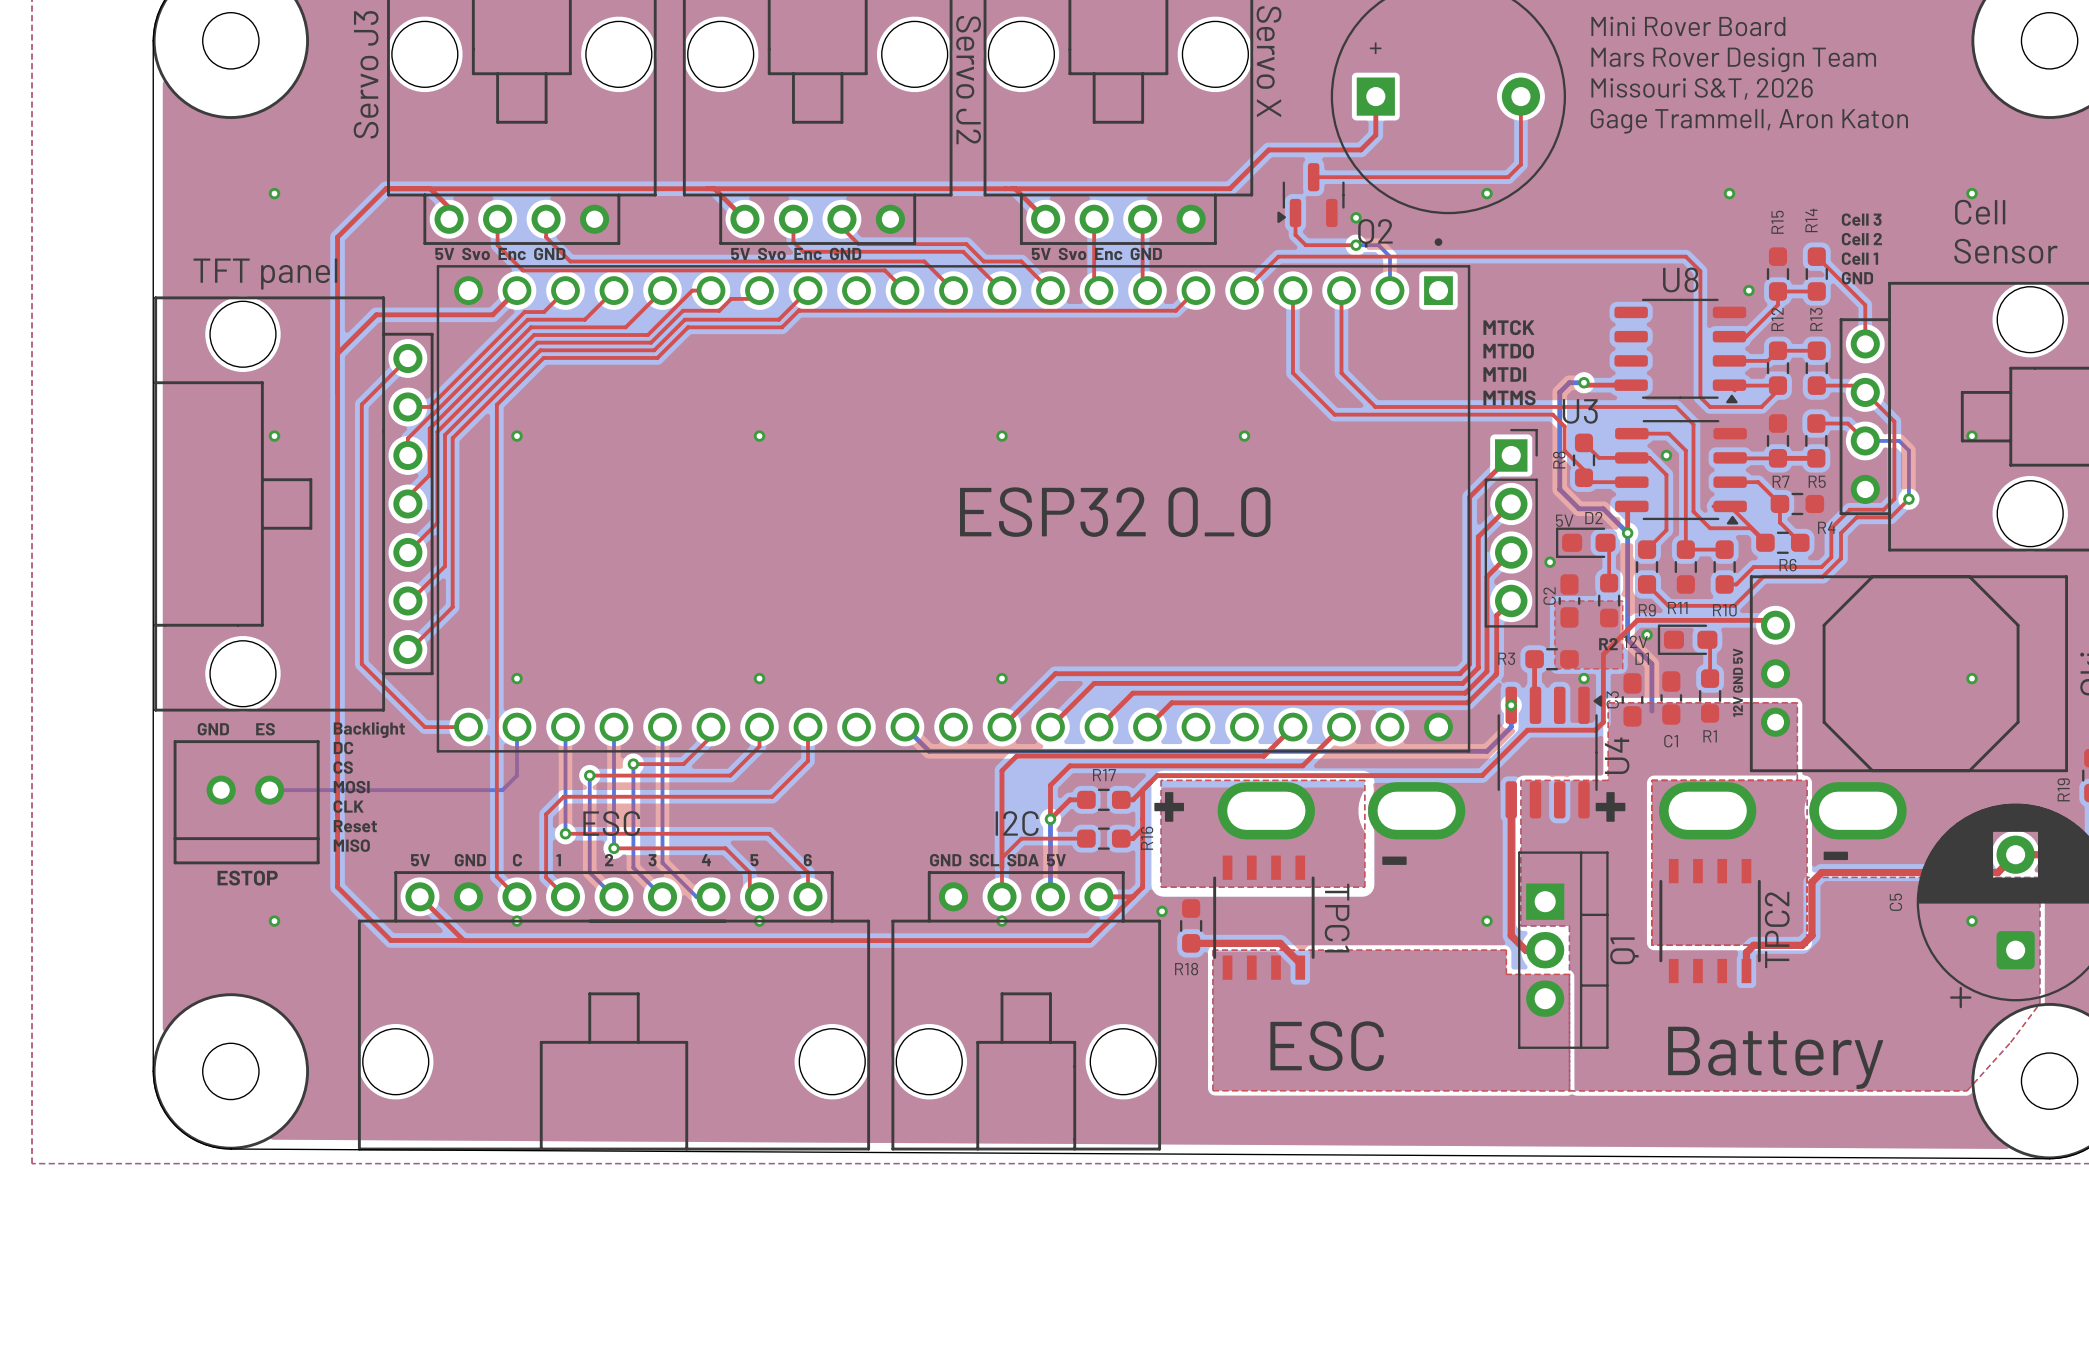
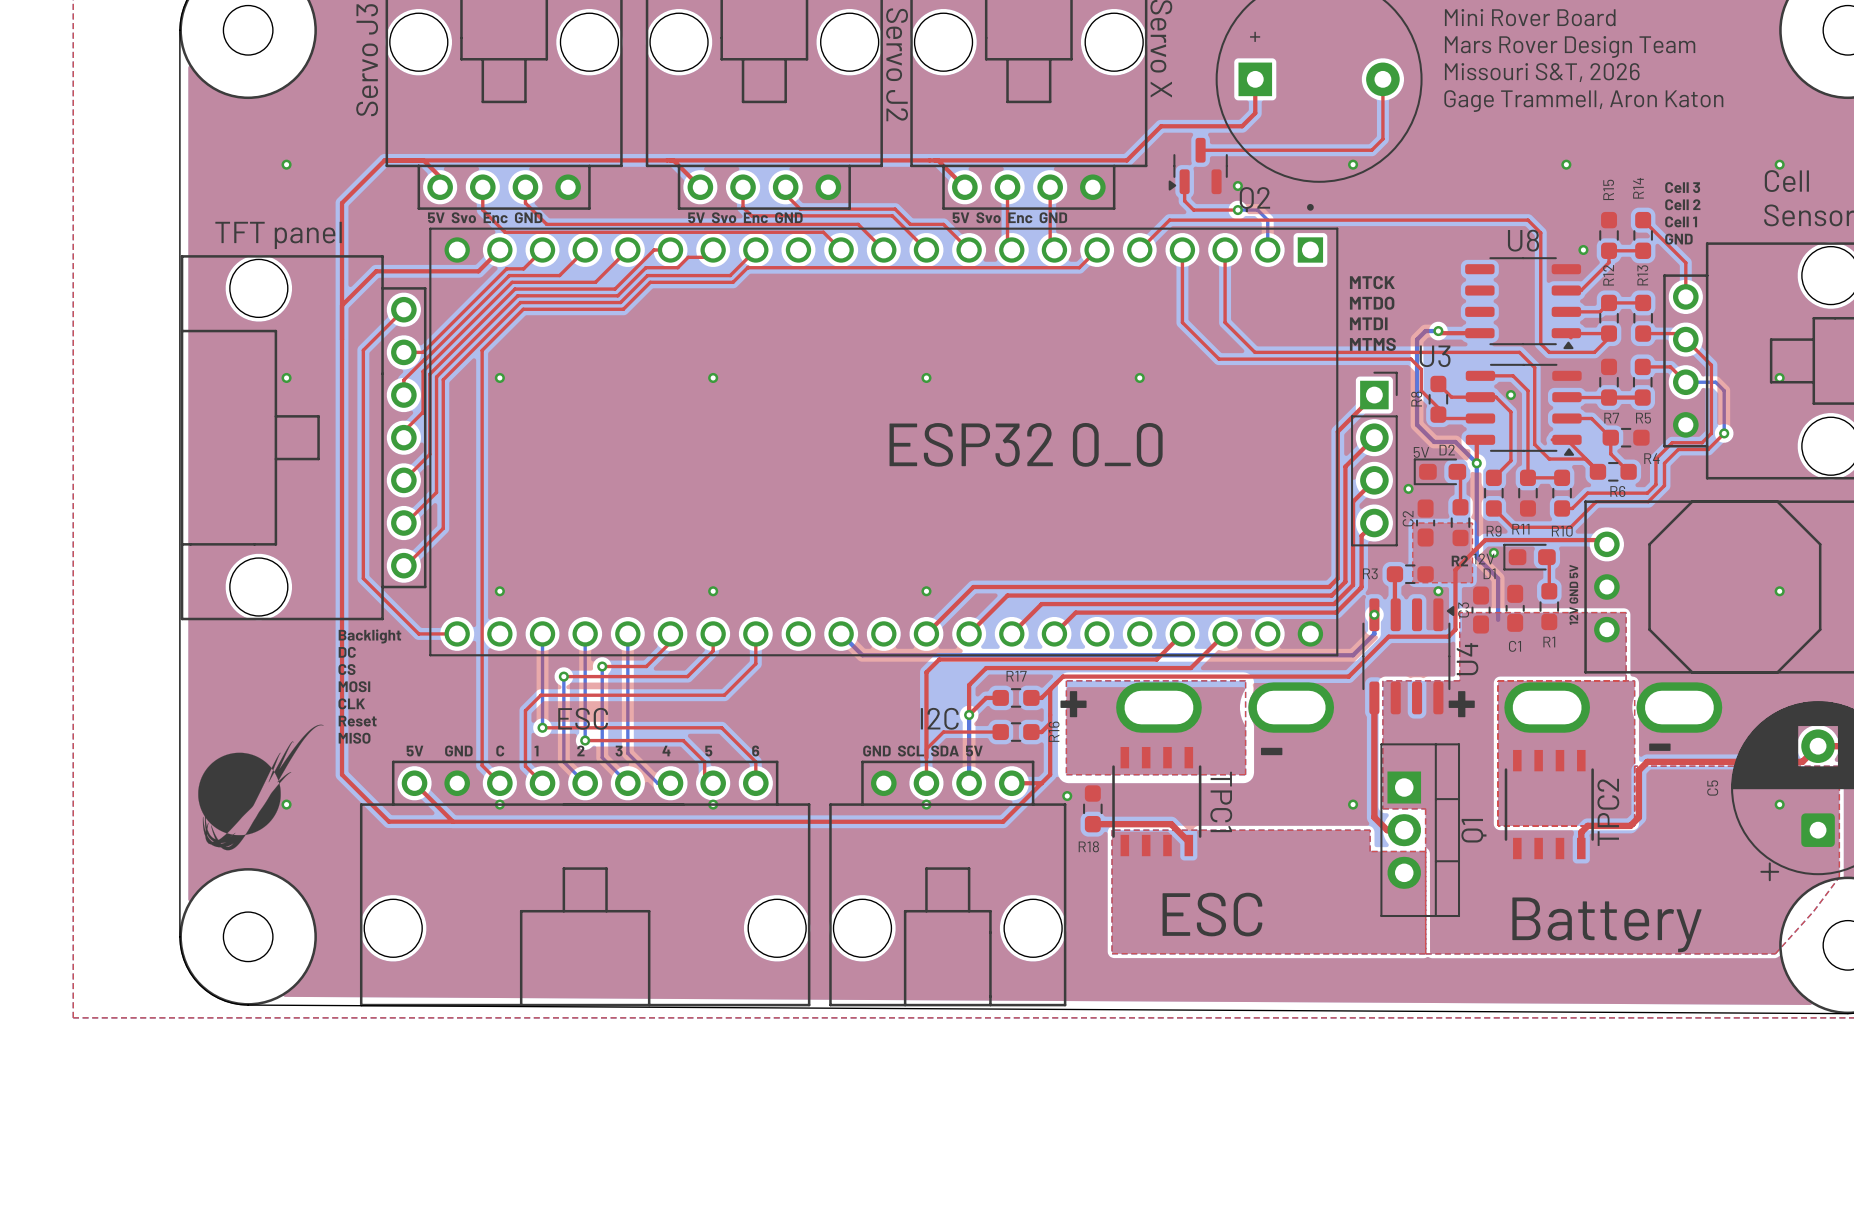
bottom track: (517, 727) (517, 775) (502, 790) (269, 790) -> none
text: GND (213, 729) -> none
text: ES (265, 729) -> none
part: (246, 802) -> none
drawing: none -> [198, 724, 324, 851]
text: ESTOP (247, 878) -> none

